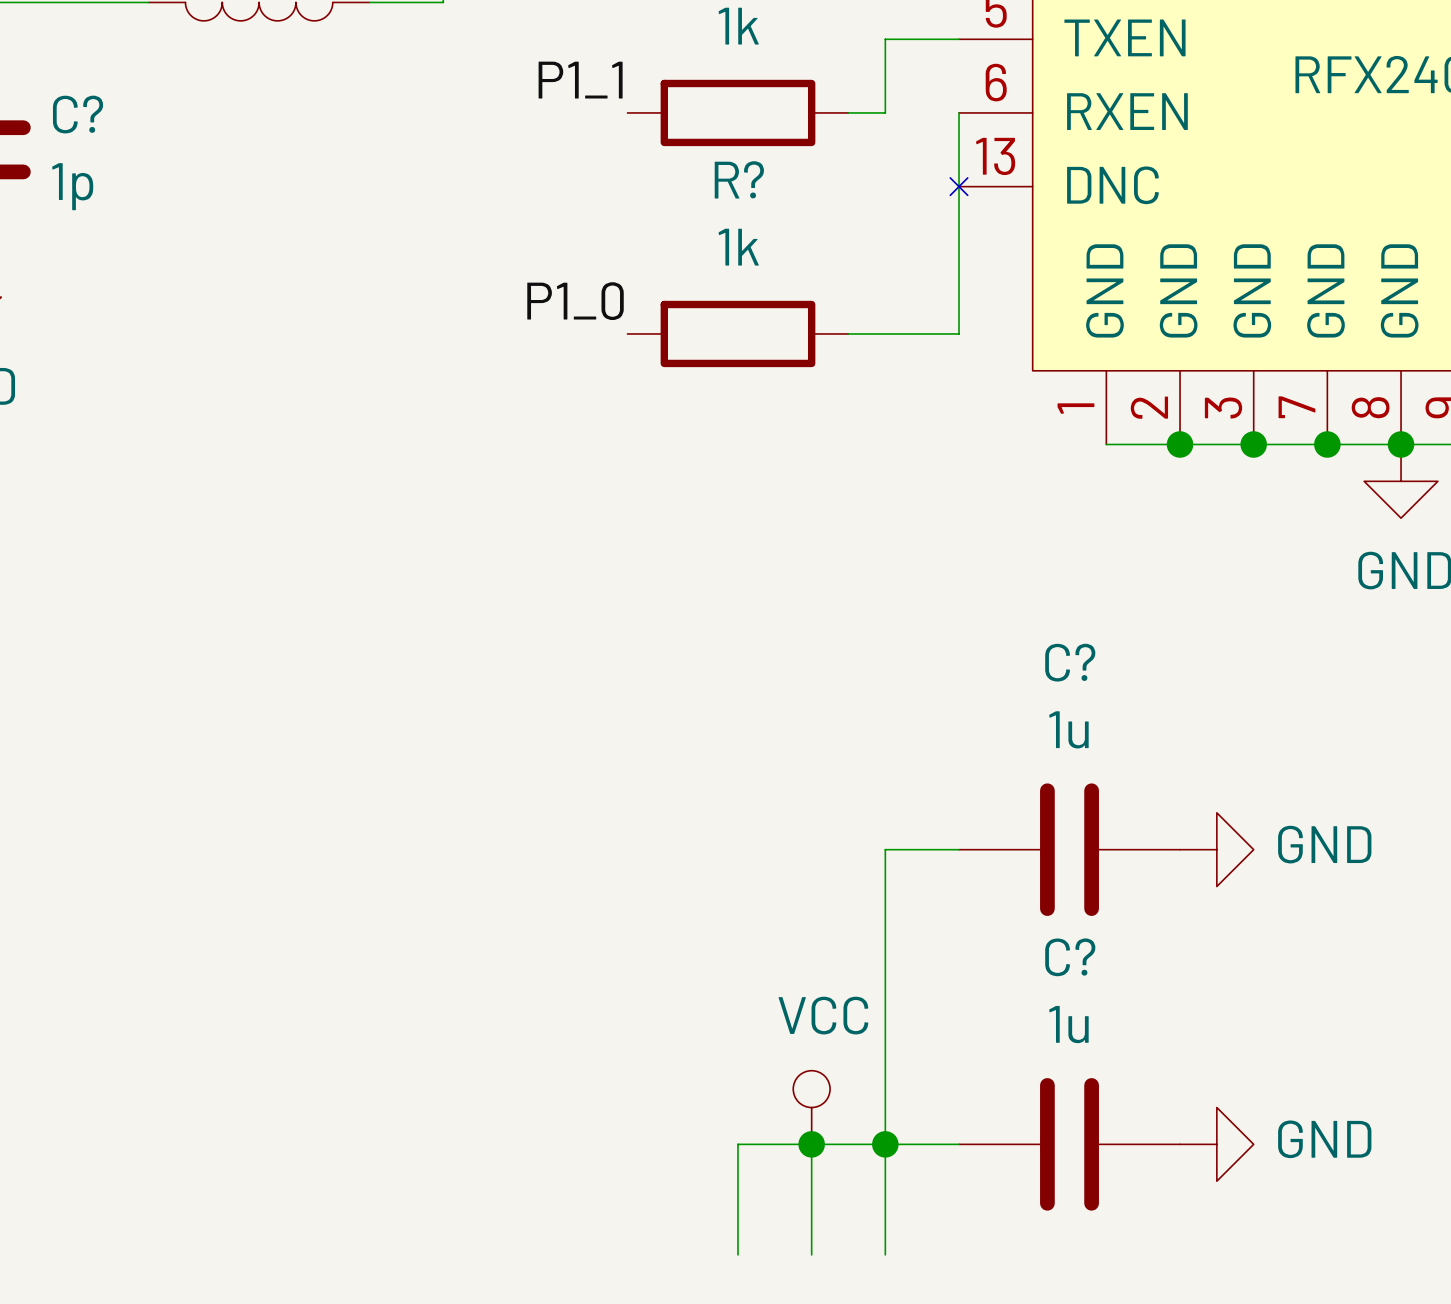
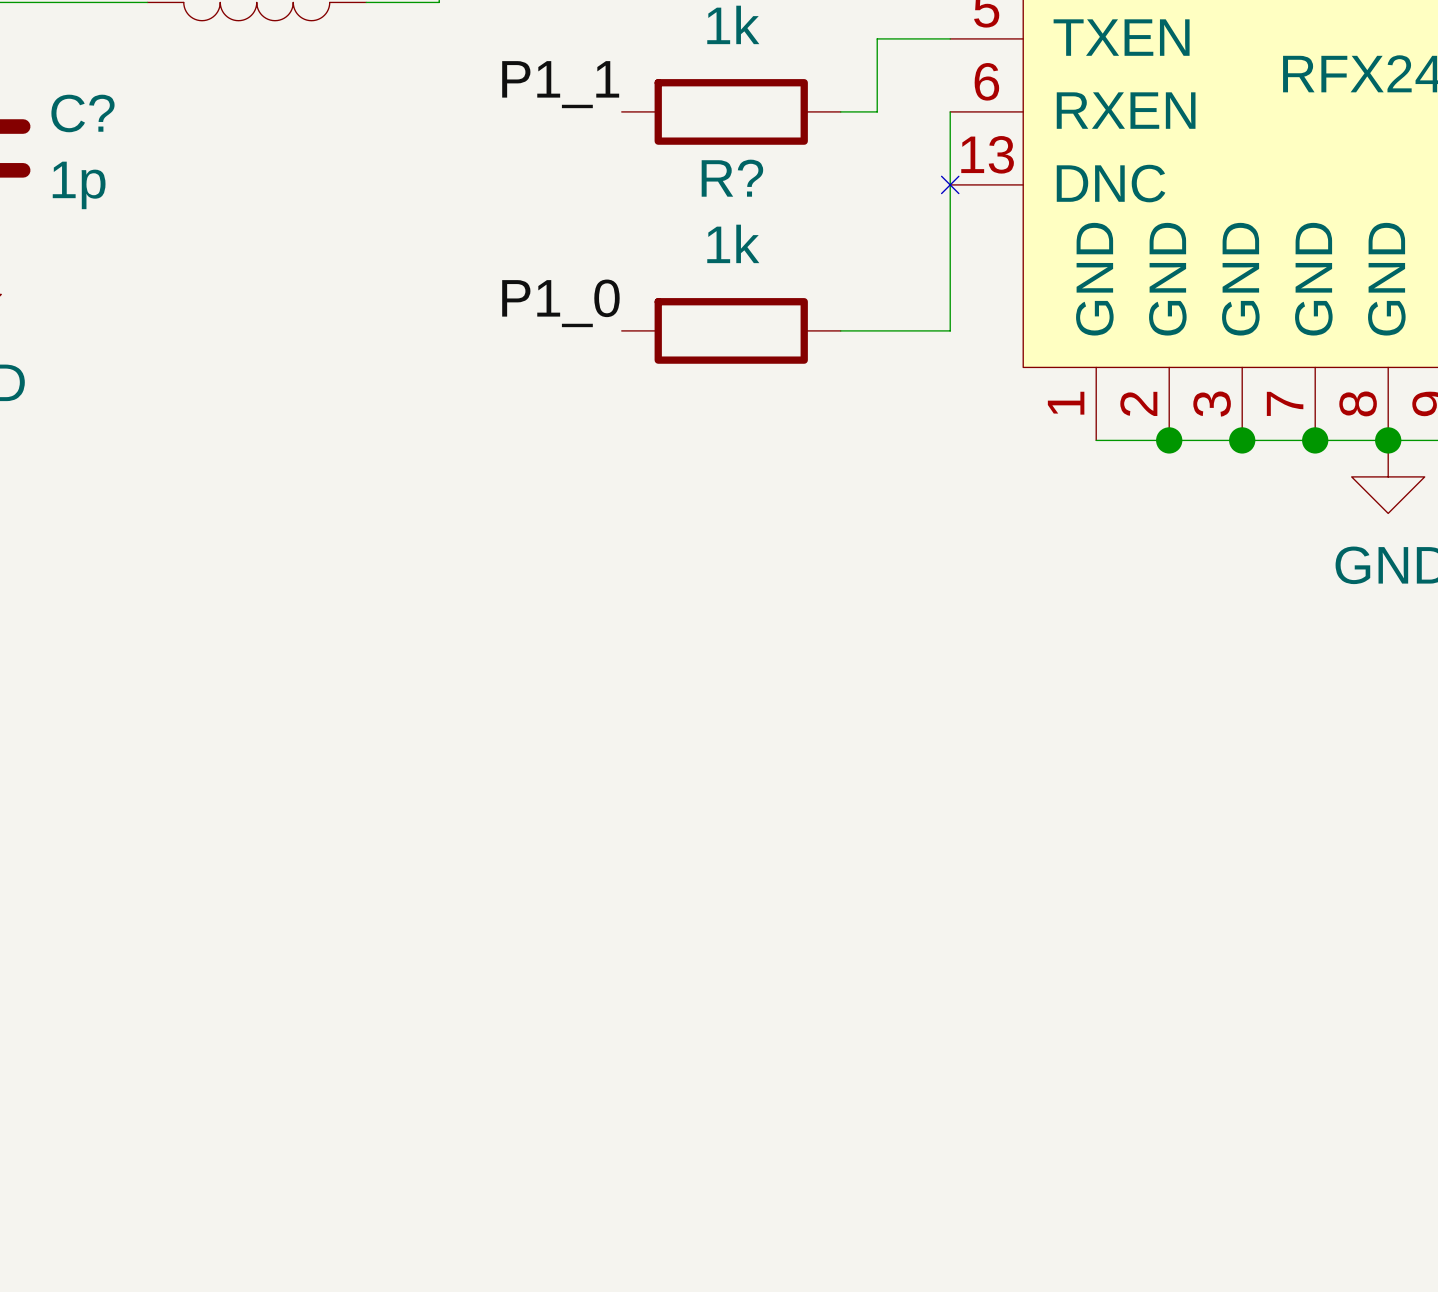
wire: (959, 849) (885, 849) (885, 1254) -> none
C?: 1u (1069, 849) -> none
power symbol: GND (1216, 849) -> none
power symbol: VCC (811, 1107) -> none
wire: (811, 1144) (811, 1254) -> none
junction: (811, 1144) -> none
junction: (885, 1144) -> none
wire: (959, 1144) (737, 1144) (737, 1254) -> none
C?: 1u (1069, 1144) -> none
power symbol: GND (1216, 1144) -> none

